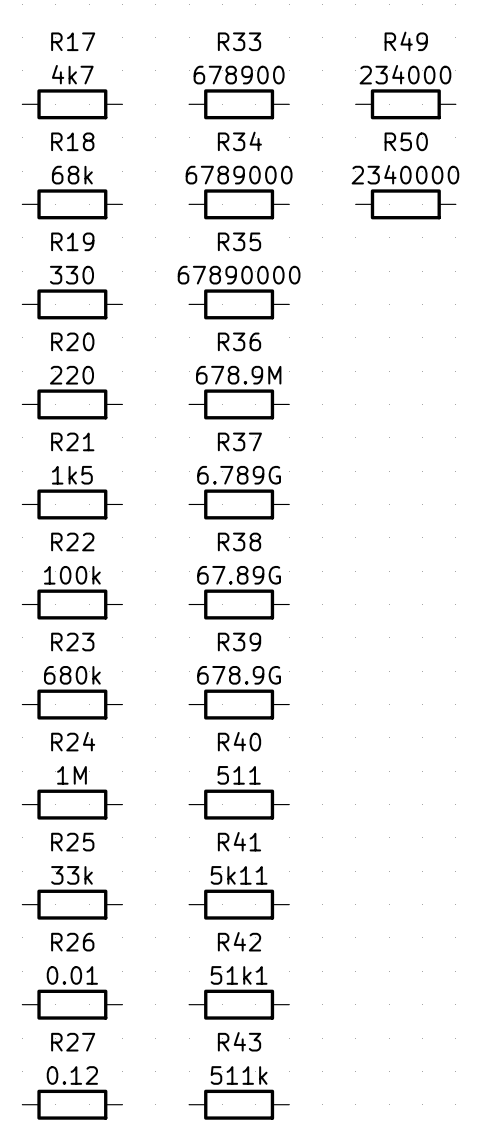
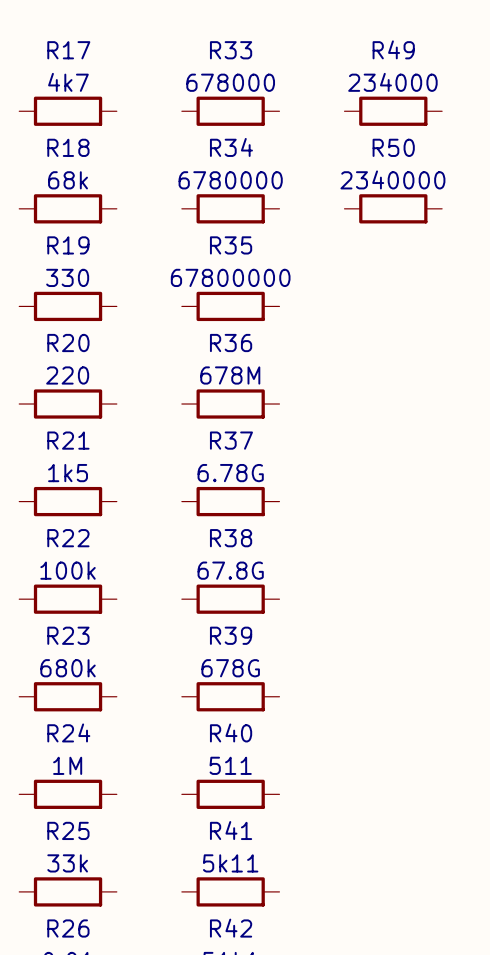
R33 value: 678900 (239, 75) -> 678000 (230, 82)
R34 value: 6789000 (239, 175) -> 6780000 (230, 180)
R35 value: 67890000 (239, 275) -> 67800000 (230, 277)
R36 value: 678.9M (238, 375) -> 678M (230, 375)
R37 value: 6.789G (239, 475) -> 6.78G (230, 473)
R38 value: 67.89G (239, 575) -> 67.8G (230, 570)
R39 value: 678.9G (239, 675) -> 678G (230, 668)

